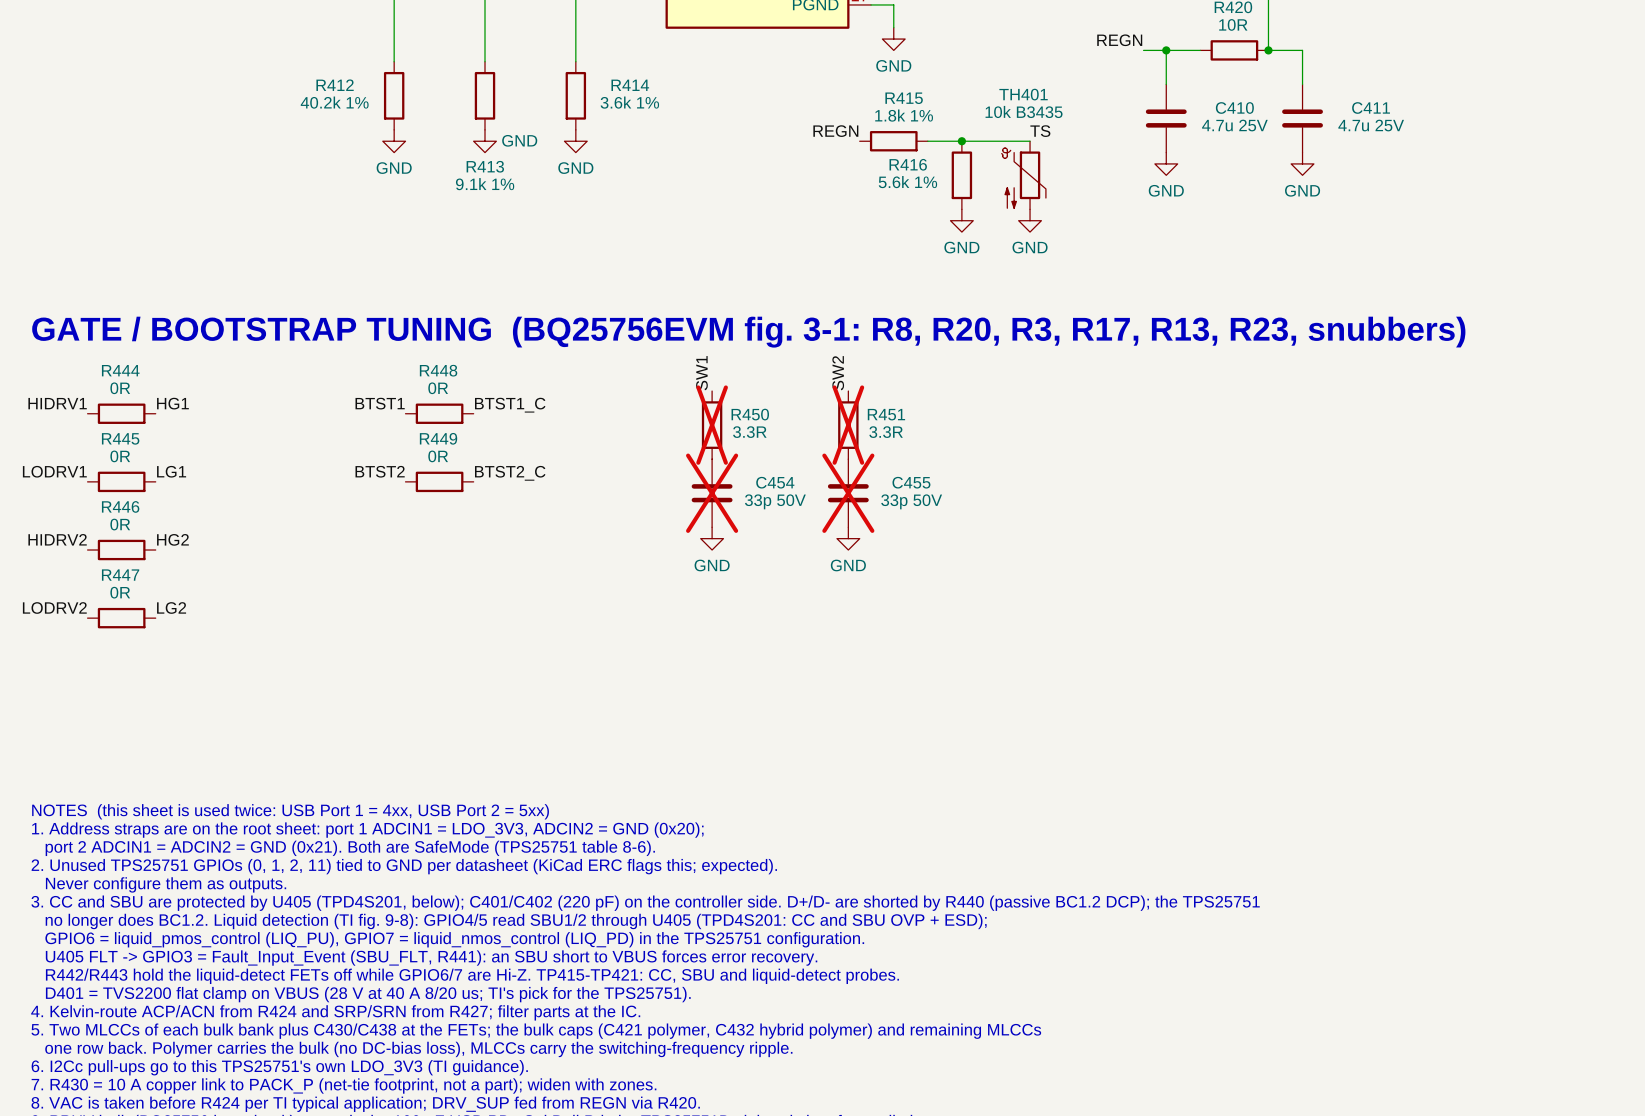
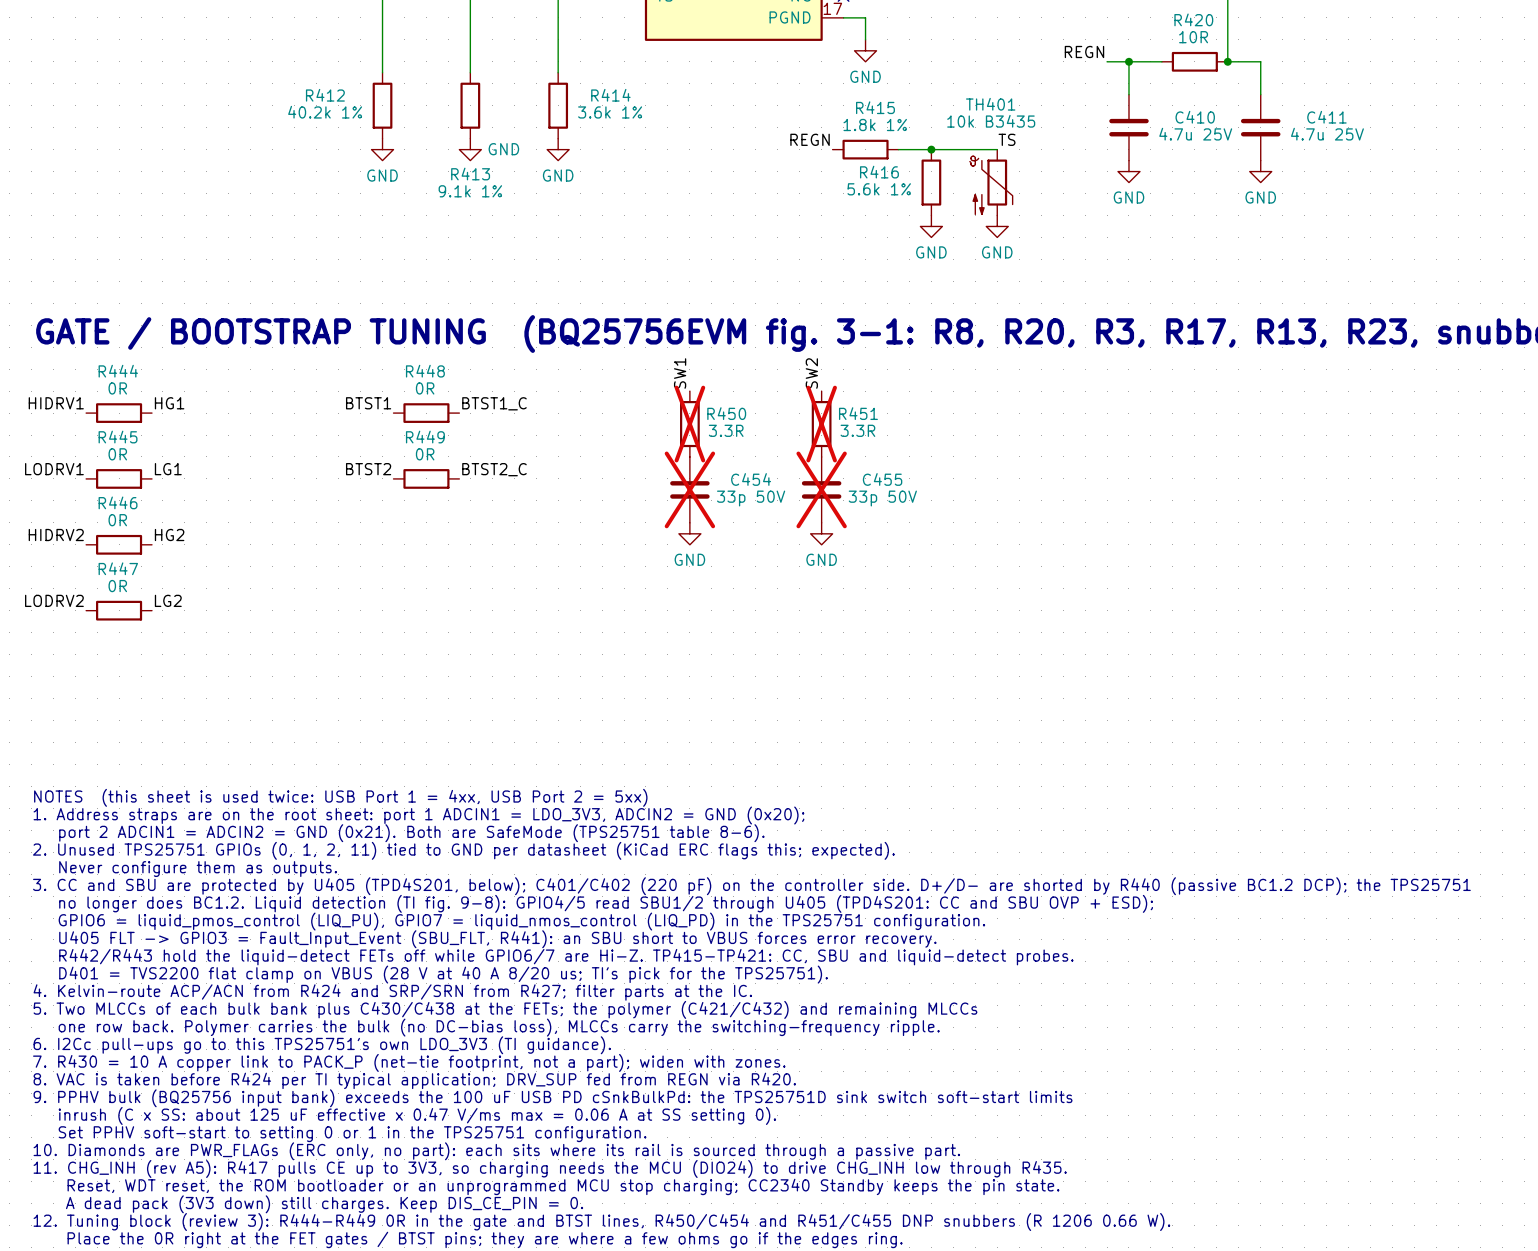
text: 5. Two MLCCs of each bulk bank plus C430/C438 at the FETs; the bulk caps (C421 polymer, C432 hybrid polymer) and remaining MLCCs (536, 1031) -> 5. Two MLCCs of each bulk bank plus C430/C438 at the FETs; the polymer (C421/C432) and remaining MLCCs (505, 1009)

